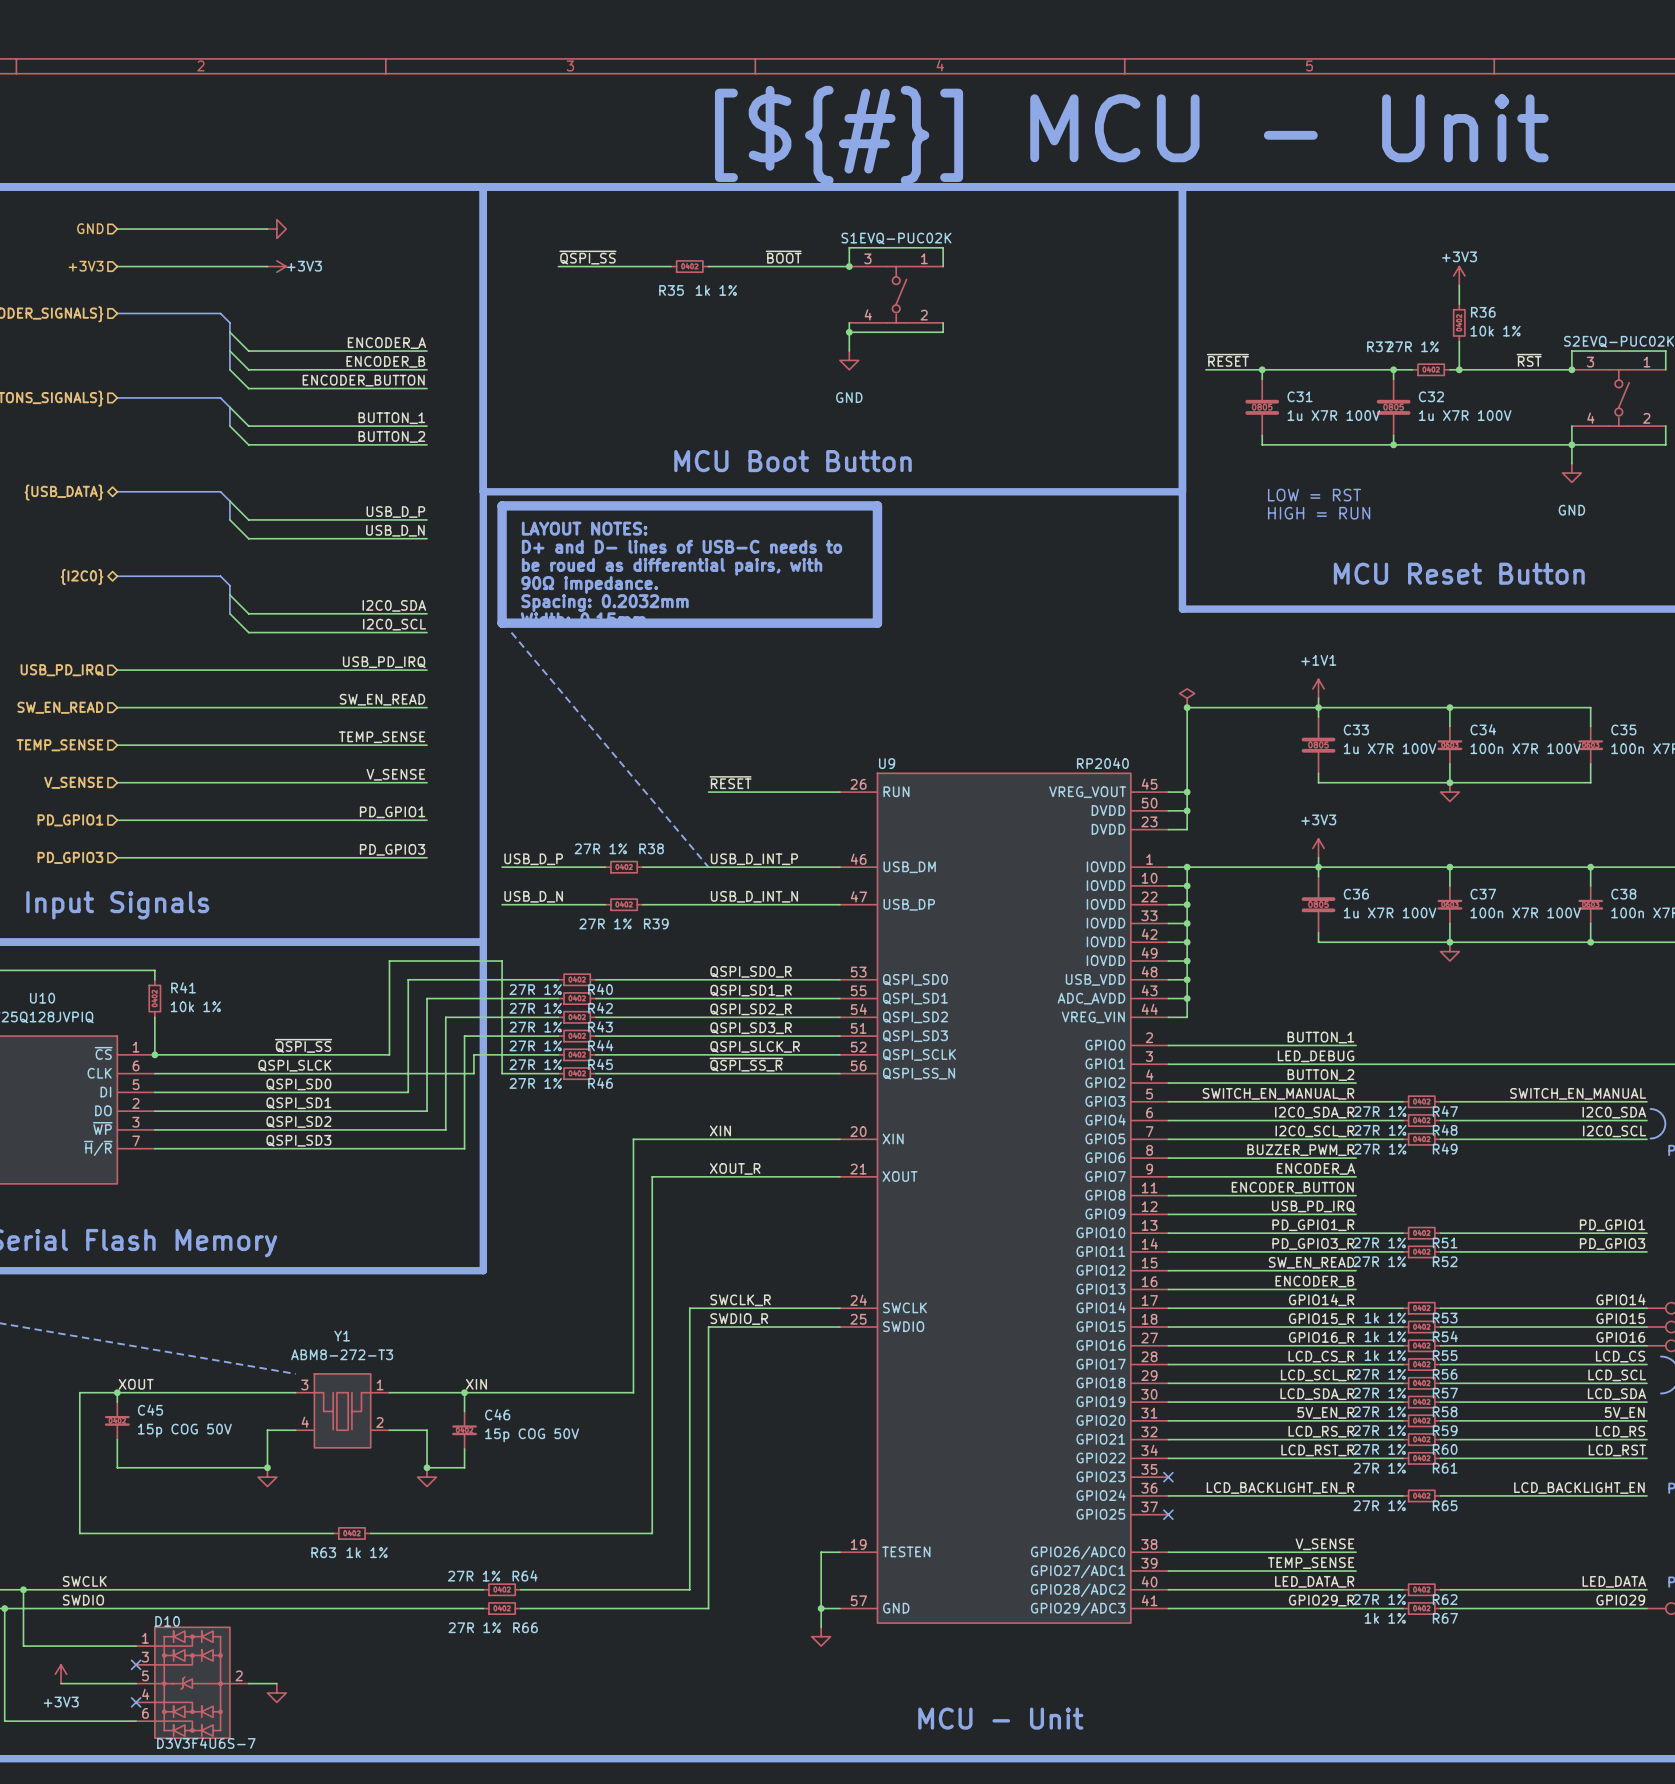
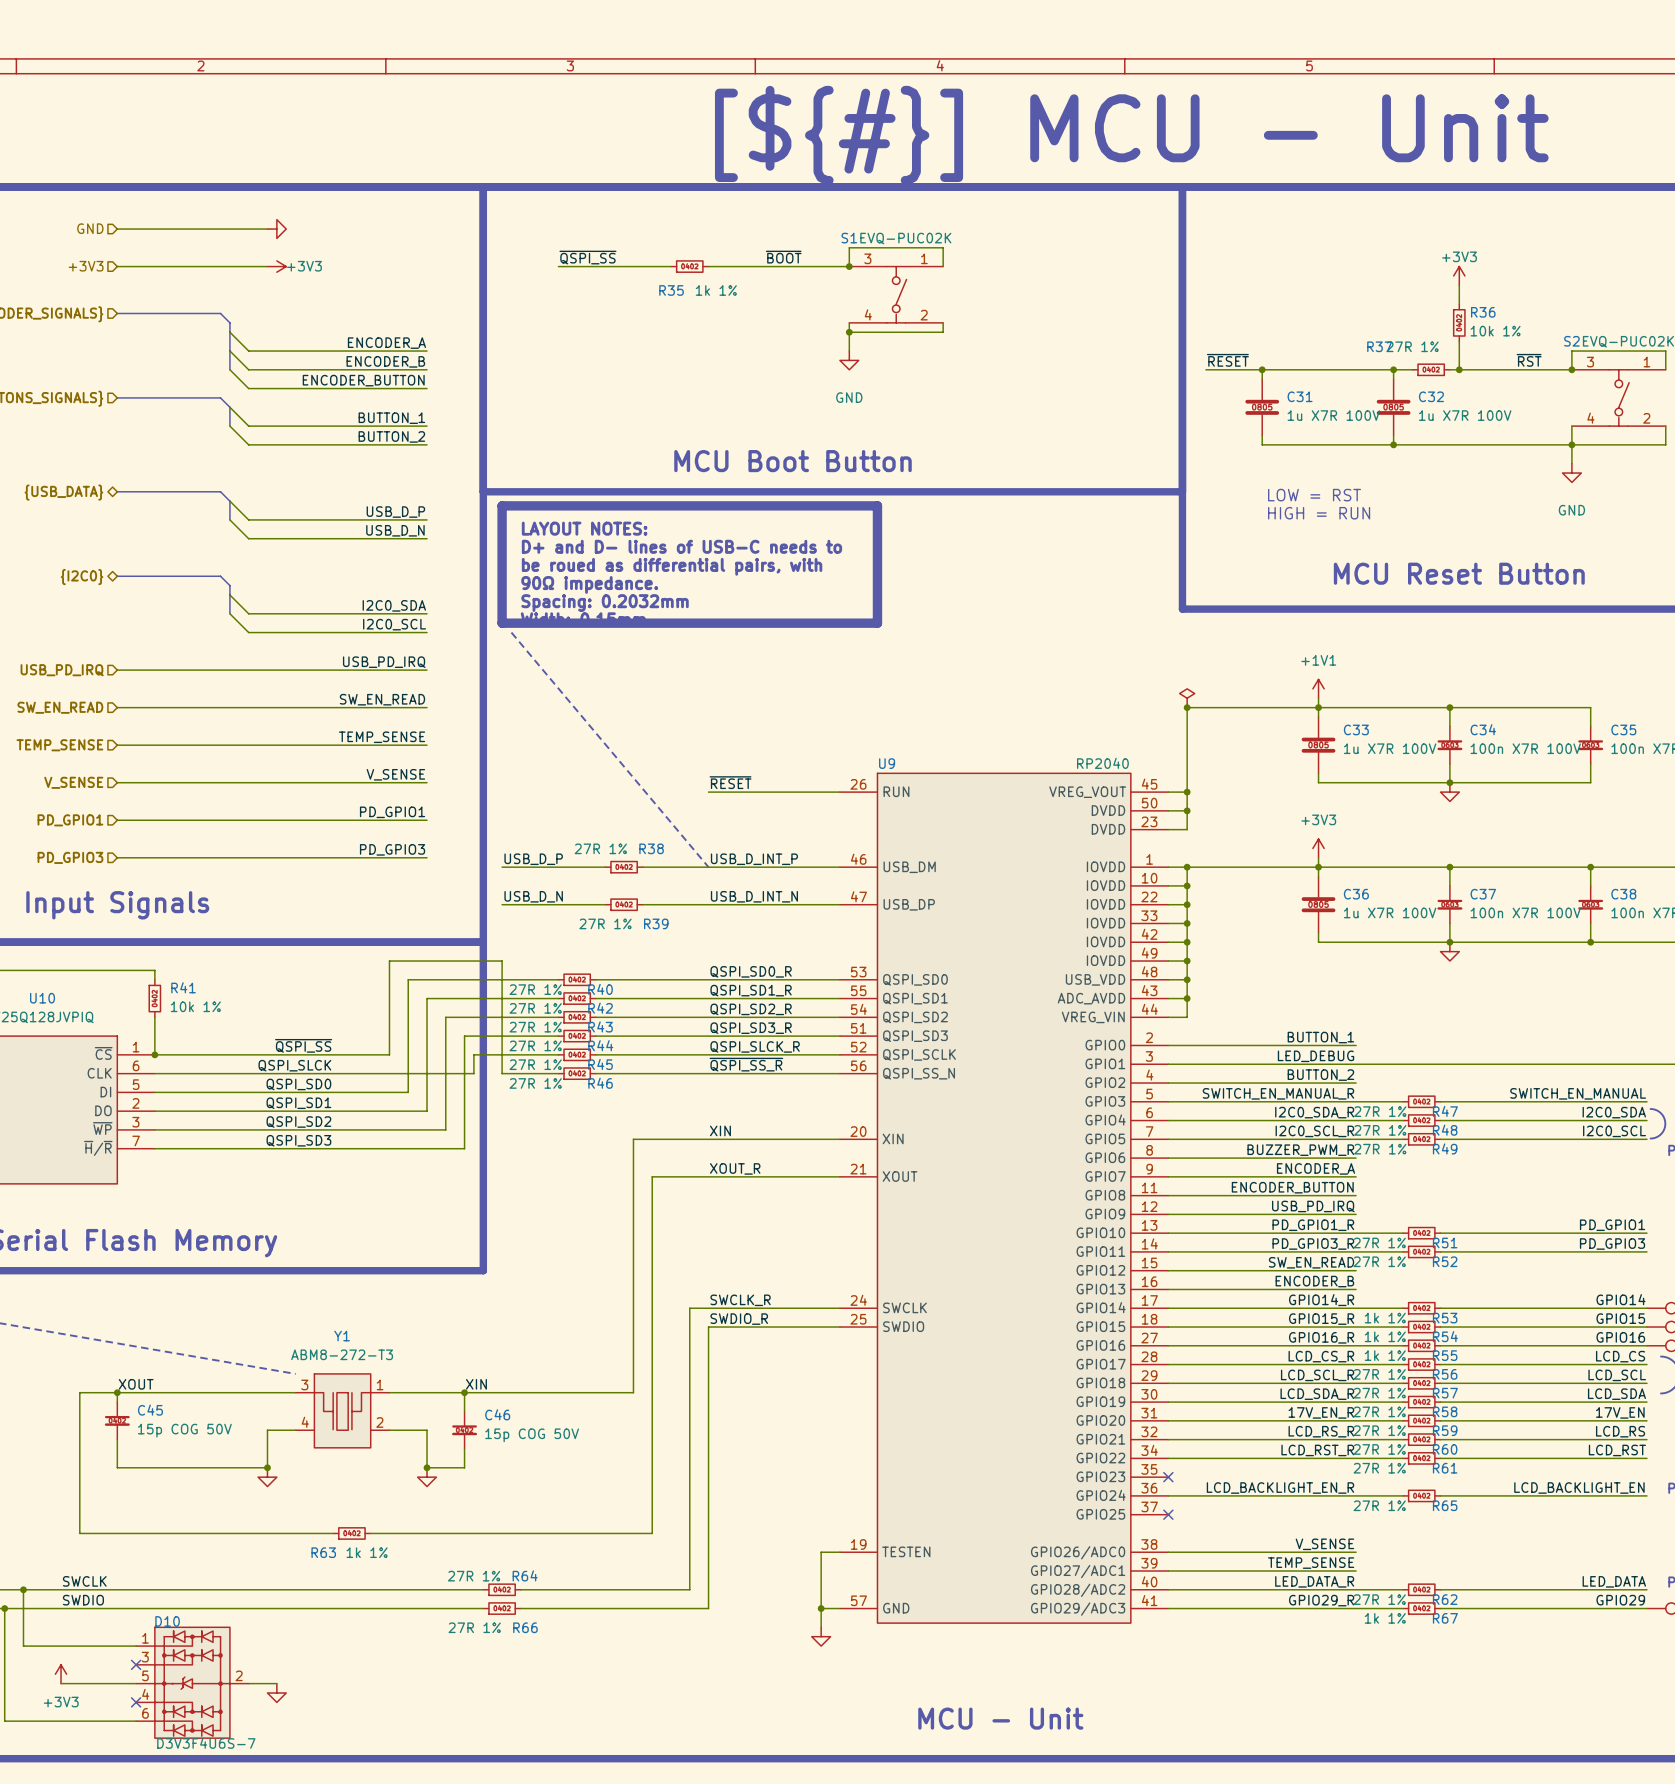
label: 5V_EN_R (1325, 1412) -> 17V_EN_R (1321, 1412)
label: 5V_EN (1624, 1412) -> 17V_EN (1620, 1412)

